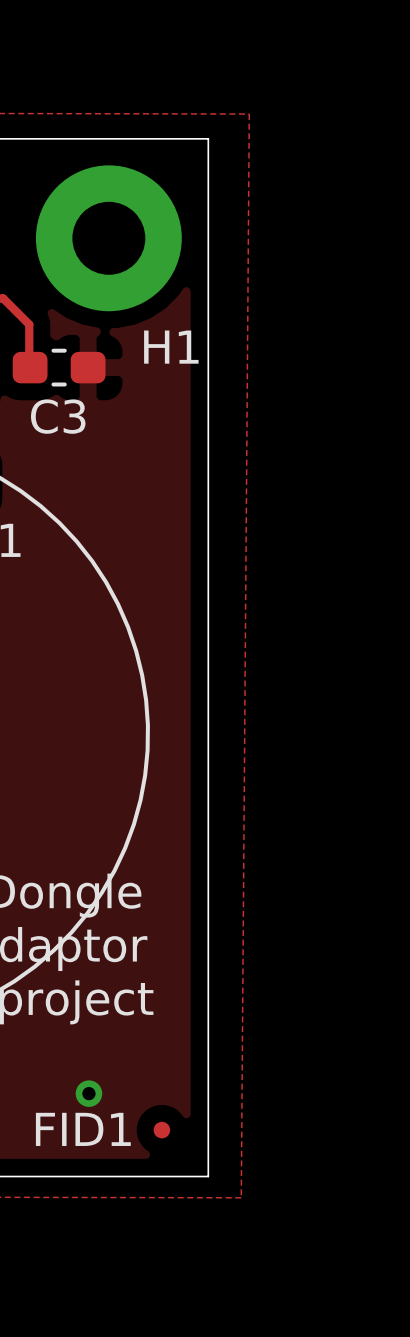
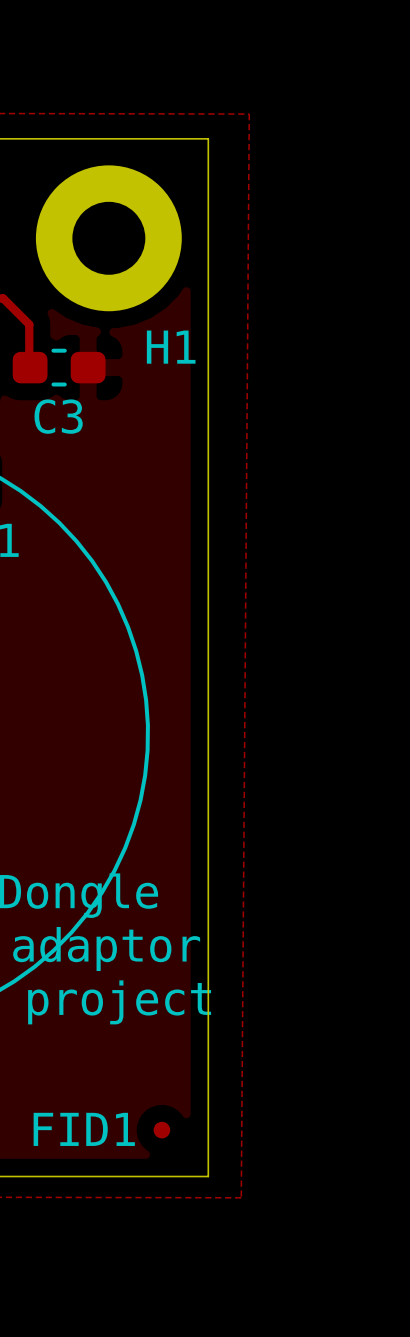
via: (88, 1093) -> none

